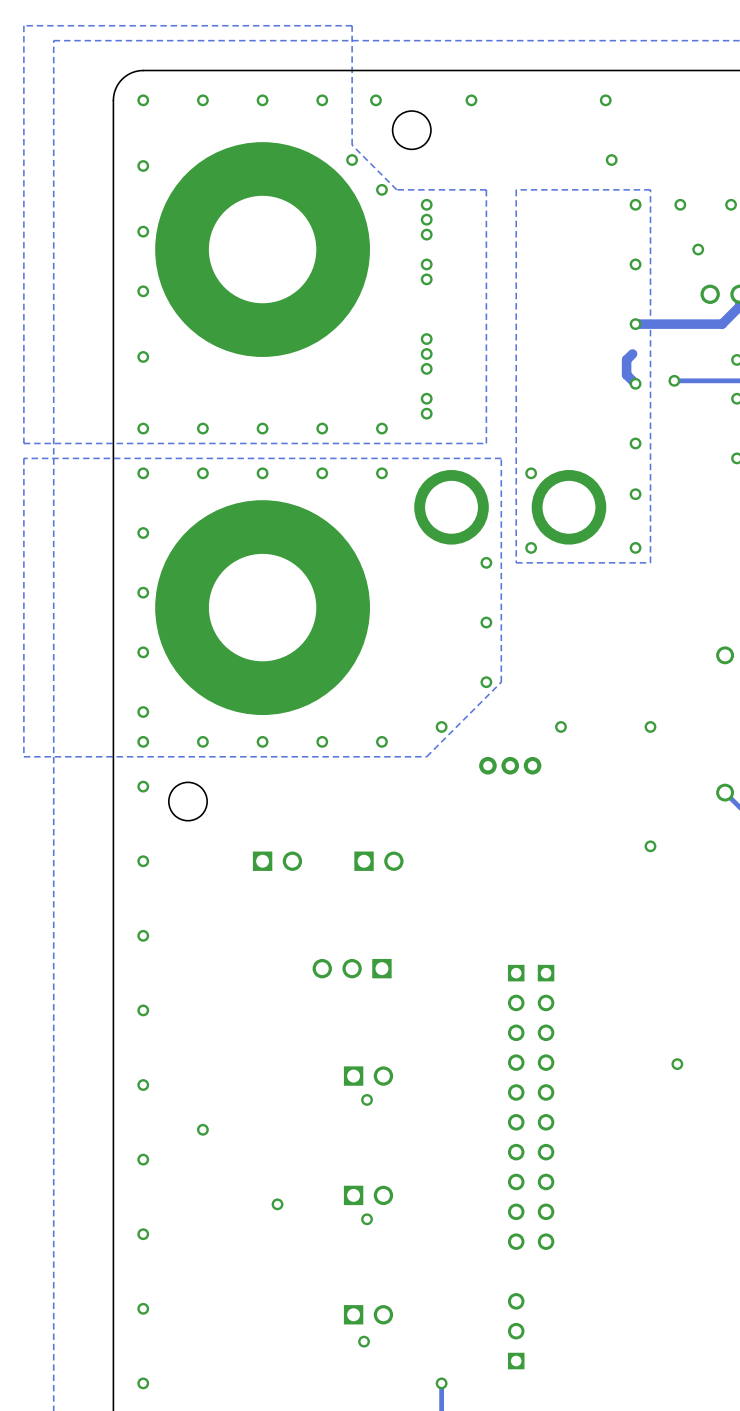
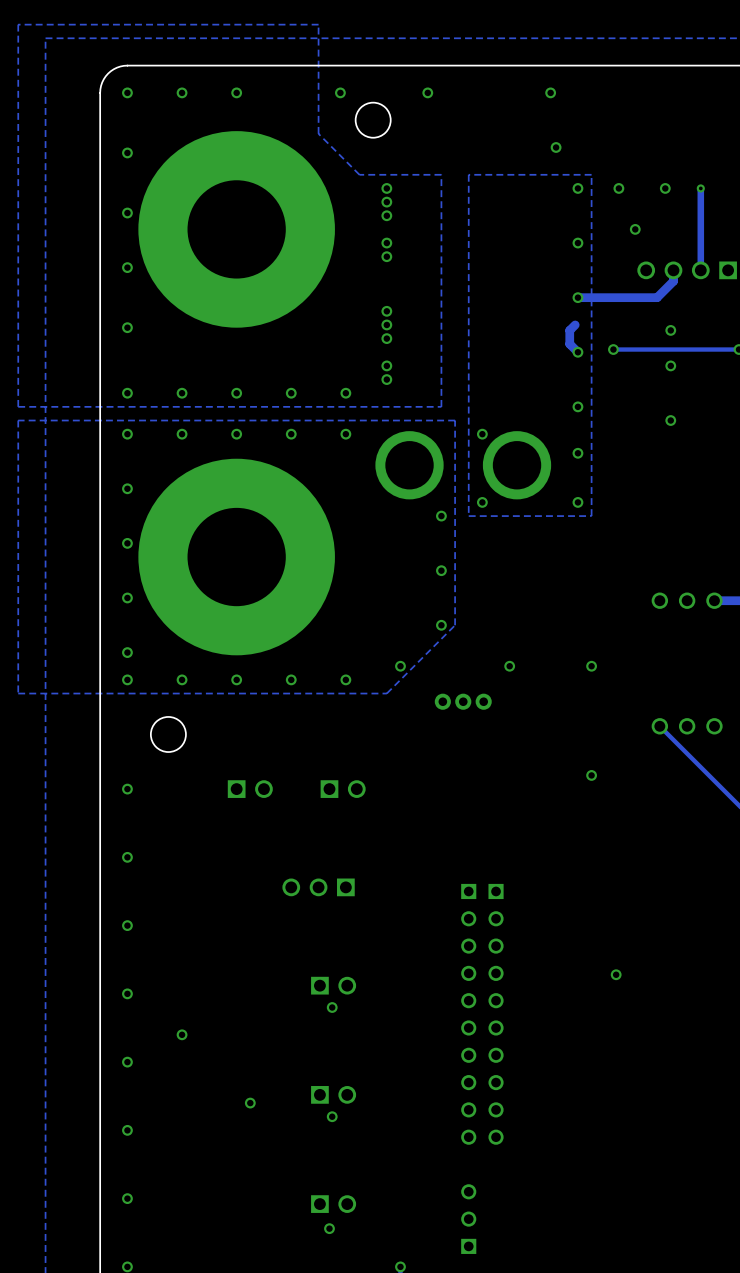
via: (322, 100) -> none
via: (352, 160) -> none
via: (381, 189) -> none
via: (143, 786) -> none

